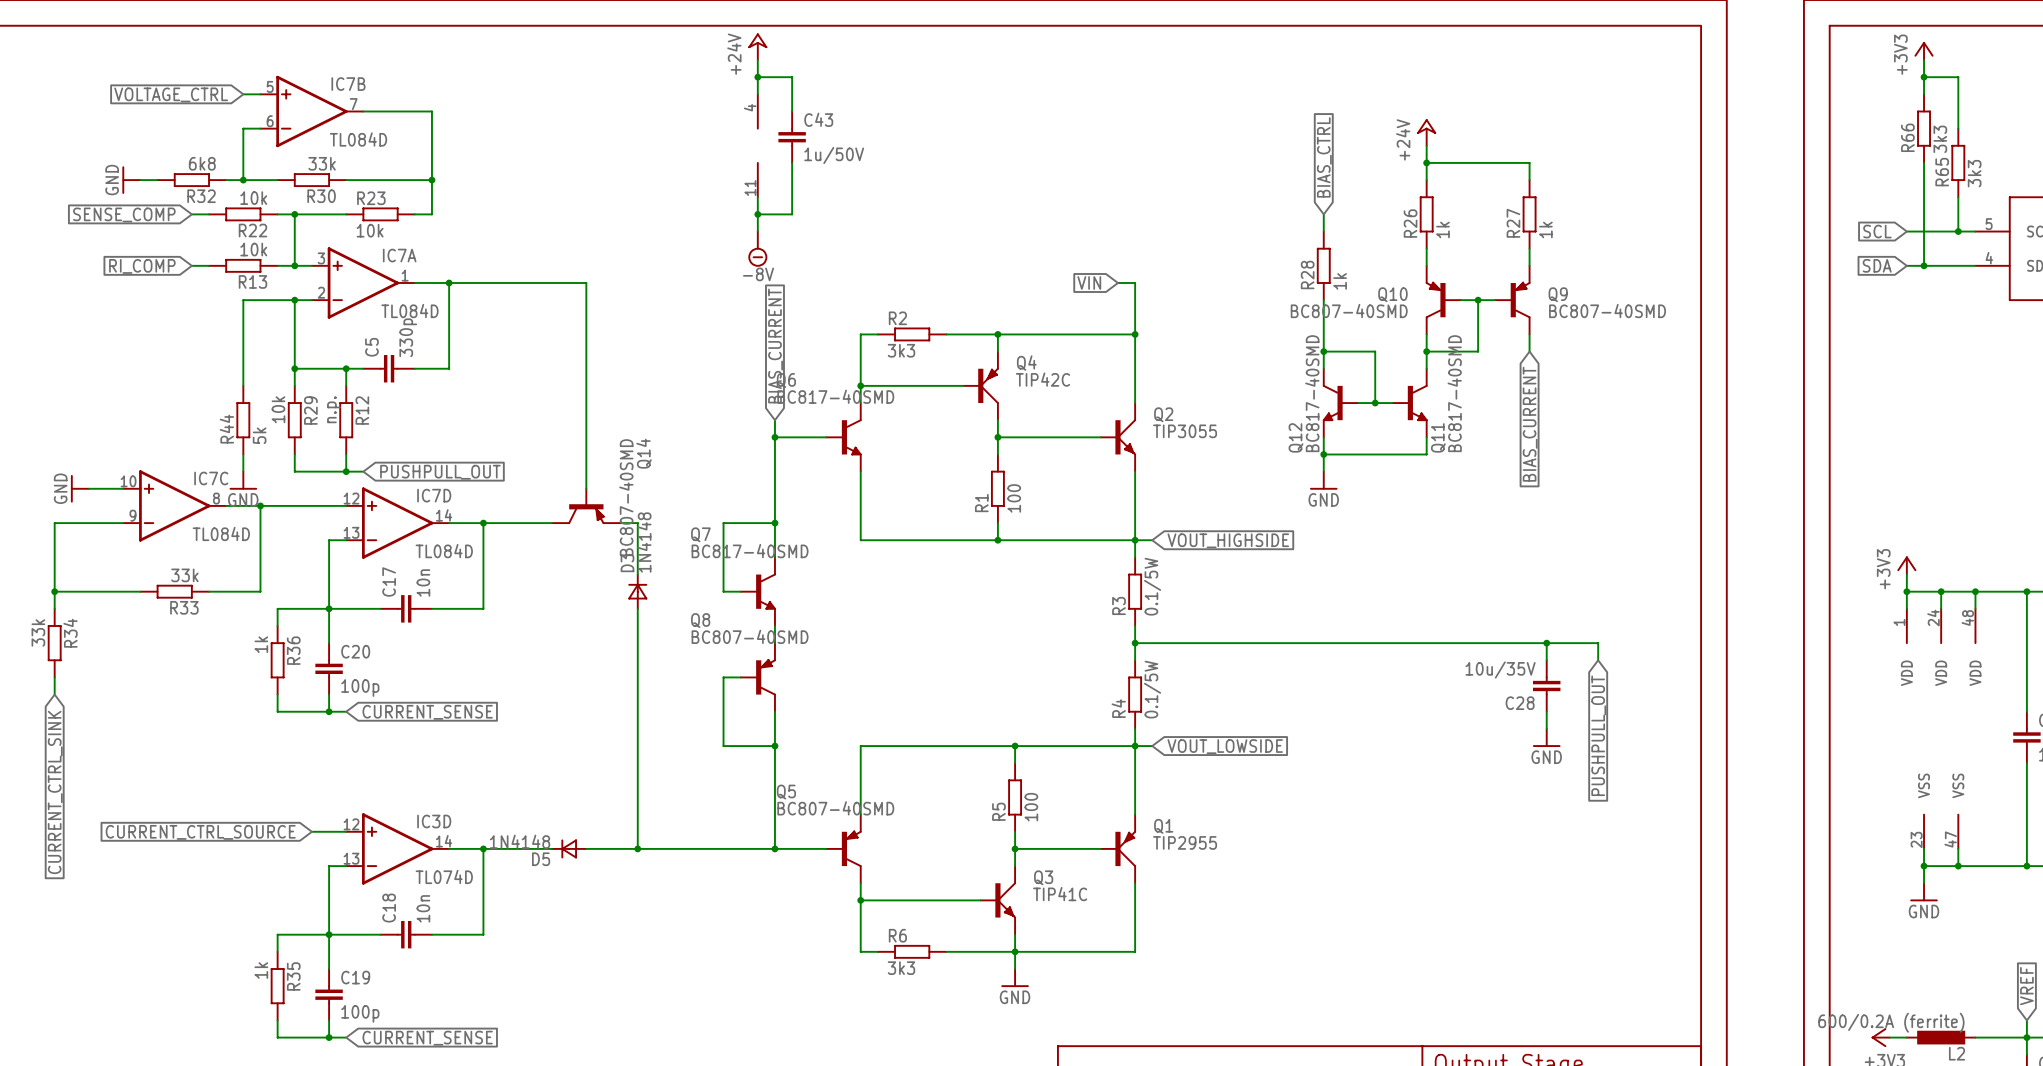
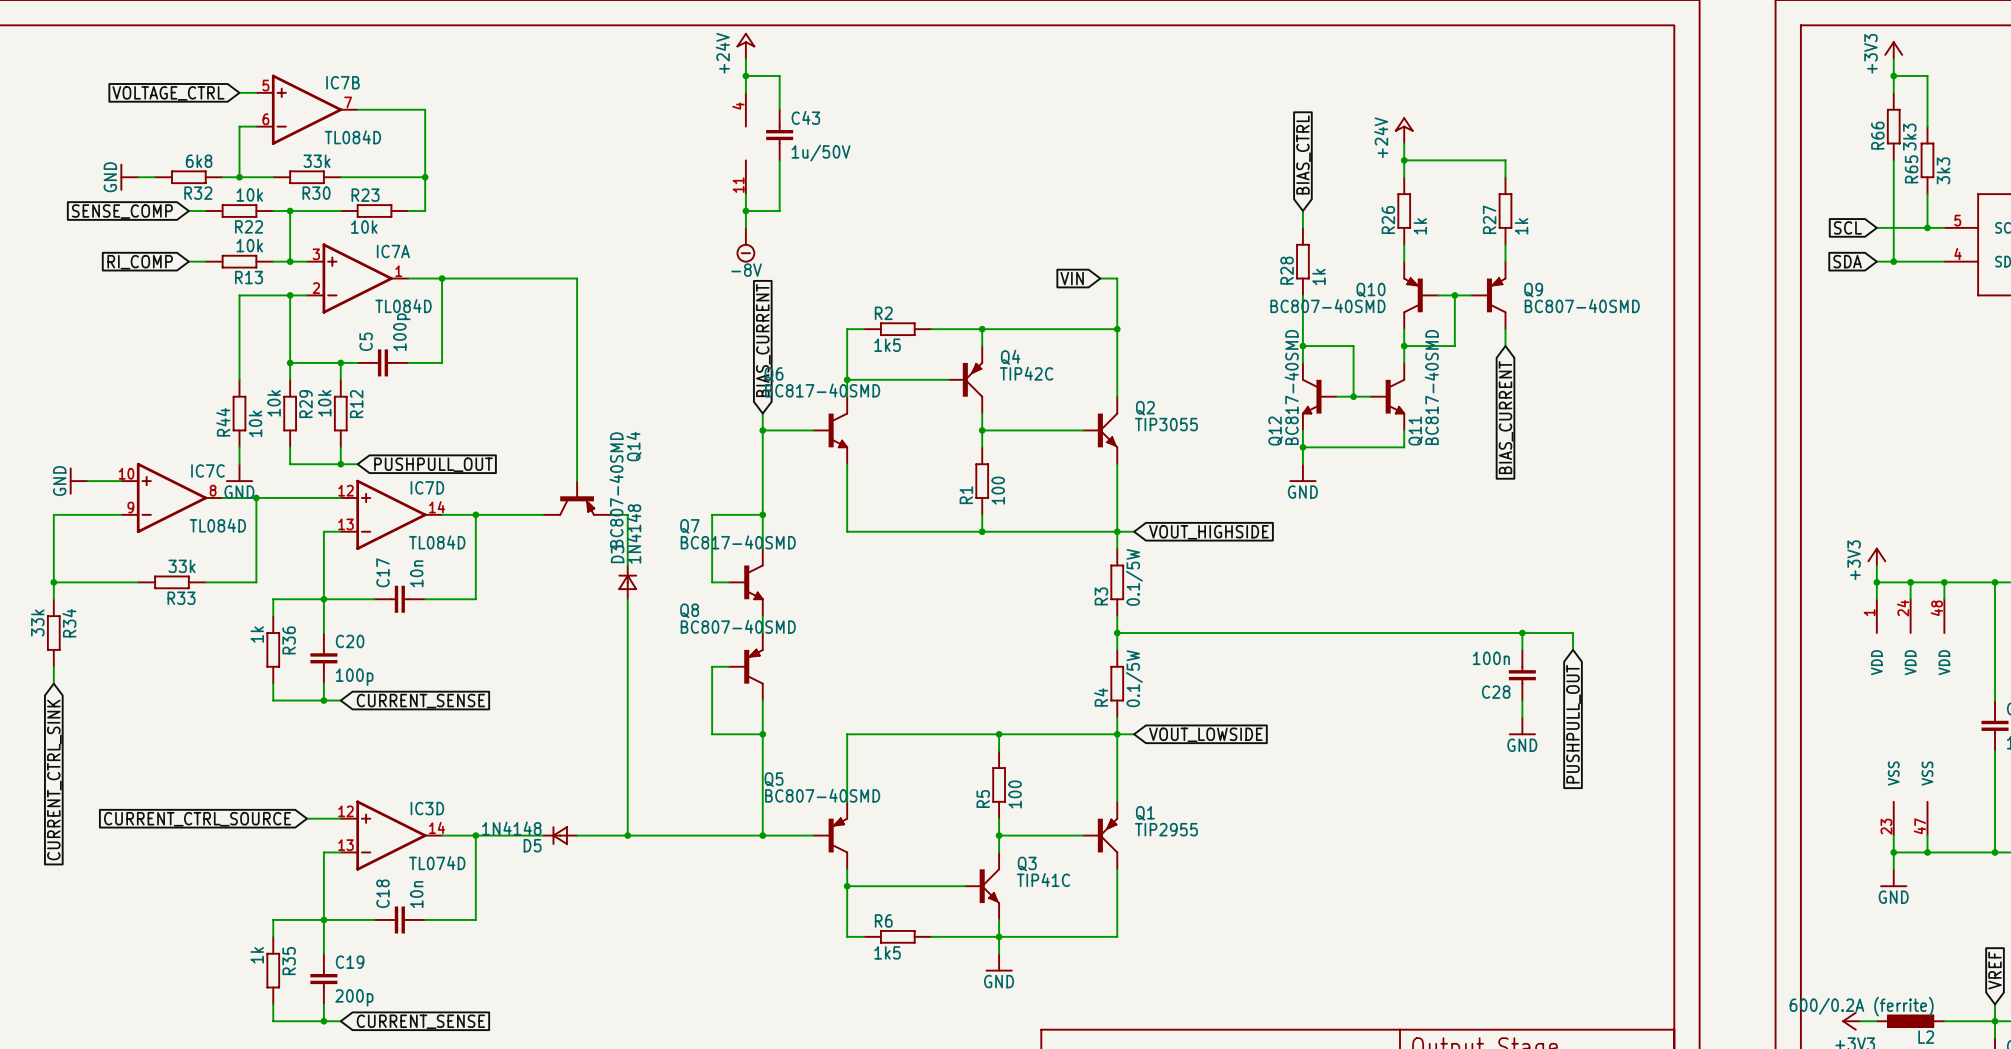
C5 value: 330p (408, 337) -> 100p (401, 332)
R2 value: 3k3 (901, 350) -> 1k5 (887, 345)
R12 value: n.p. (333, 409) -> 10k (324, 403)
R44 value: 5k (259, 435) -> 10k (255, 423)
C28 value: 10u/35V (1500, 670) -> 100n (1491, 658)
R6 value: 3k3 (901, 968) -> 1k5 (887, 952)
C19 value: 100p (360, 1013) -> 200p (354, 997)

